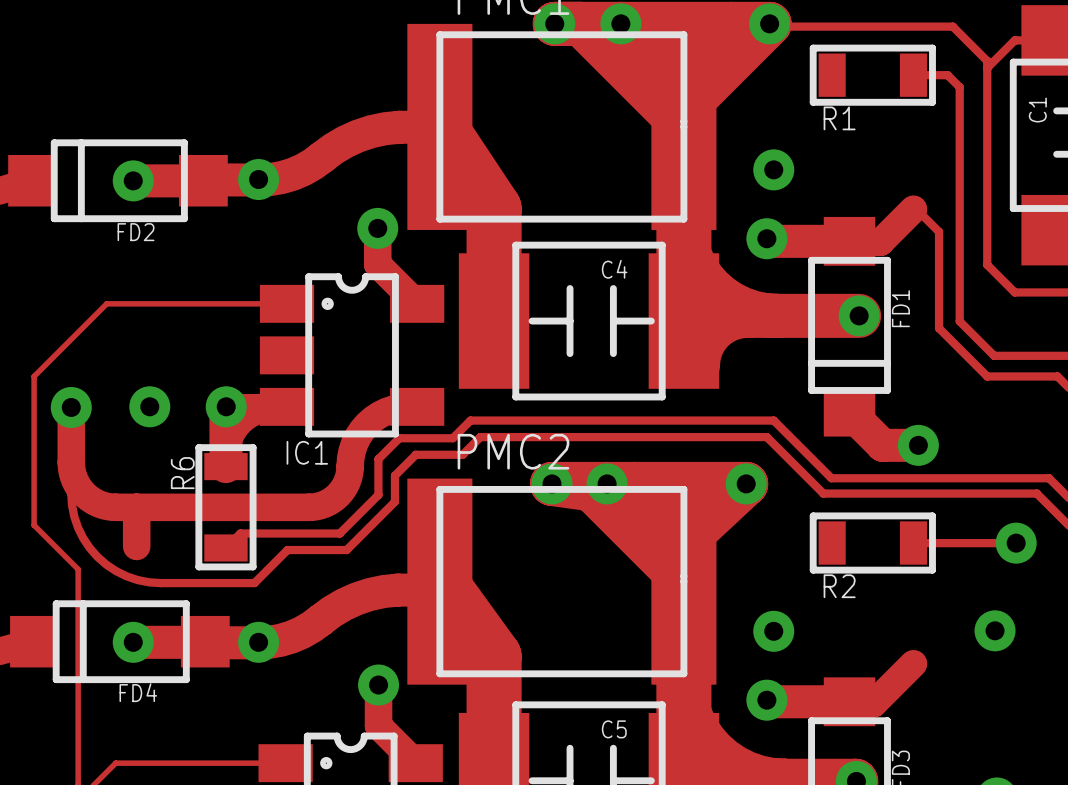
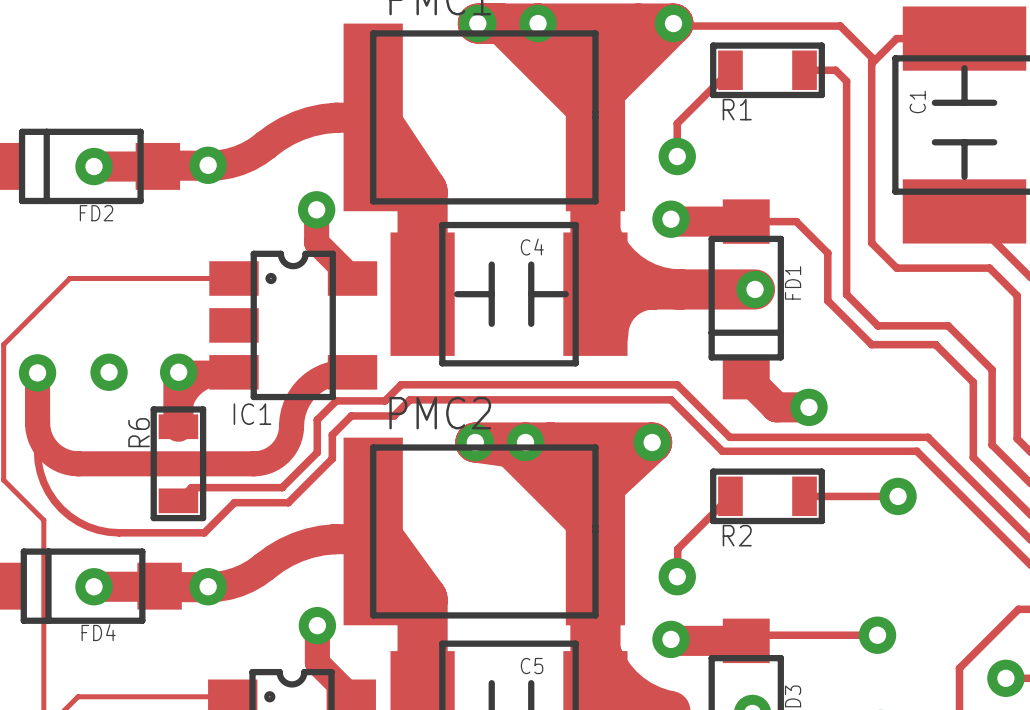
track: none -> (730, 70) (677, 123) (677, 156)
track: (913, 206) (939, 231) (939, 275) -> none
track: (913, 209) (880, 242) (850, 242) -> (827, 253) (796, 221) (746, 221)
track: (136, 507) (136, 546) -> none
track: none -> (730, 496) (677, 549) (677, 576)
via position: (995, 630) -> (877, 635)
track: (913, 663) (873, 703) (851, 703) -> none
track: none -> (877, 635) (751, 635) (746, 640)

